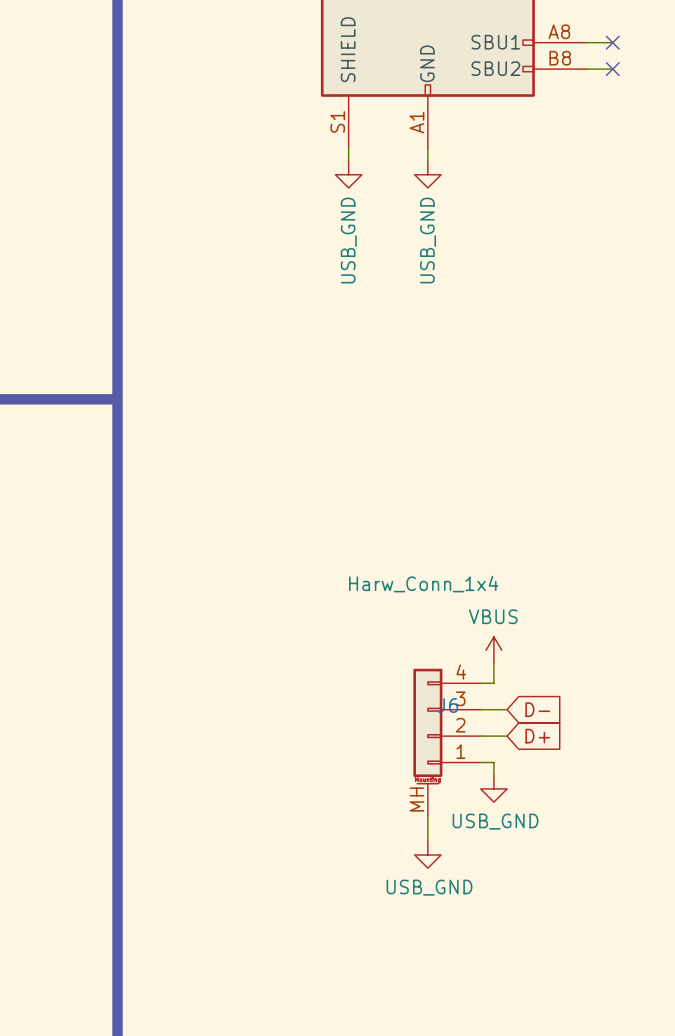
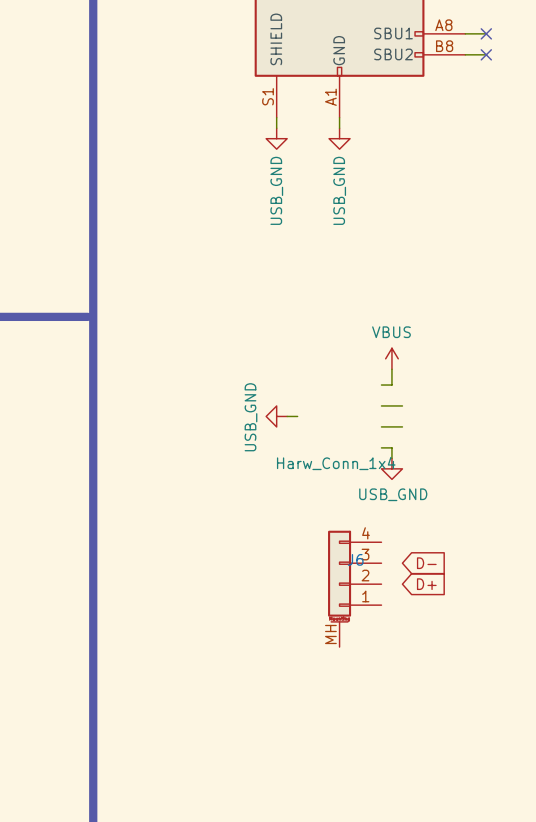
power symbol: none -> USB_GND (276, 416)
wire: none -> (287, 416) (297, 416)
power symbol: none -> USB_GND (391, 468)
power symbol position: VBUS (493, 650) -> VBUS (391, 358)
wire: (493, 663) (493, 683) (480, 683) -> (391, 369) (391, 385) (381, 385)
wire: (480, 709) (507, 709) -> (381, 405) (402, 405)
wire: (480, 736) (507, 736) -> (381, 426) (402, 426)
wire: (480, 762) (493, 762) (493, 775) -> (381, 447) (391, 447) (391, 458)
power symbol: USB_GND (493, 788) -> none
wire: (427, 815) (427, 841) -> none
power symbol: USB_GND (427, 854) -> none

